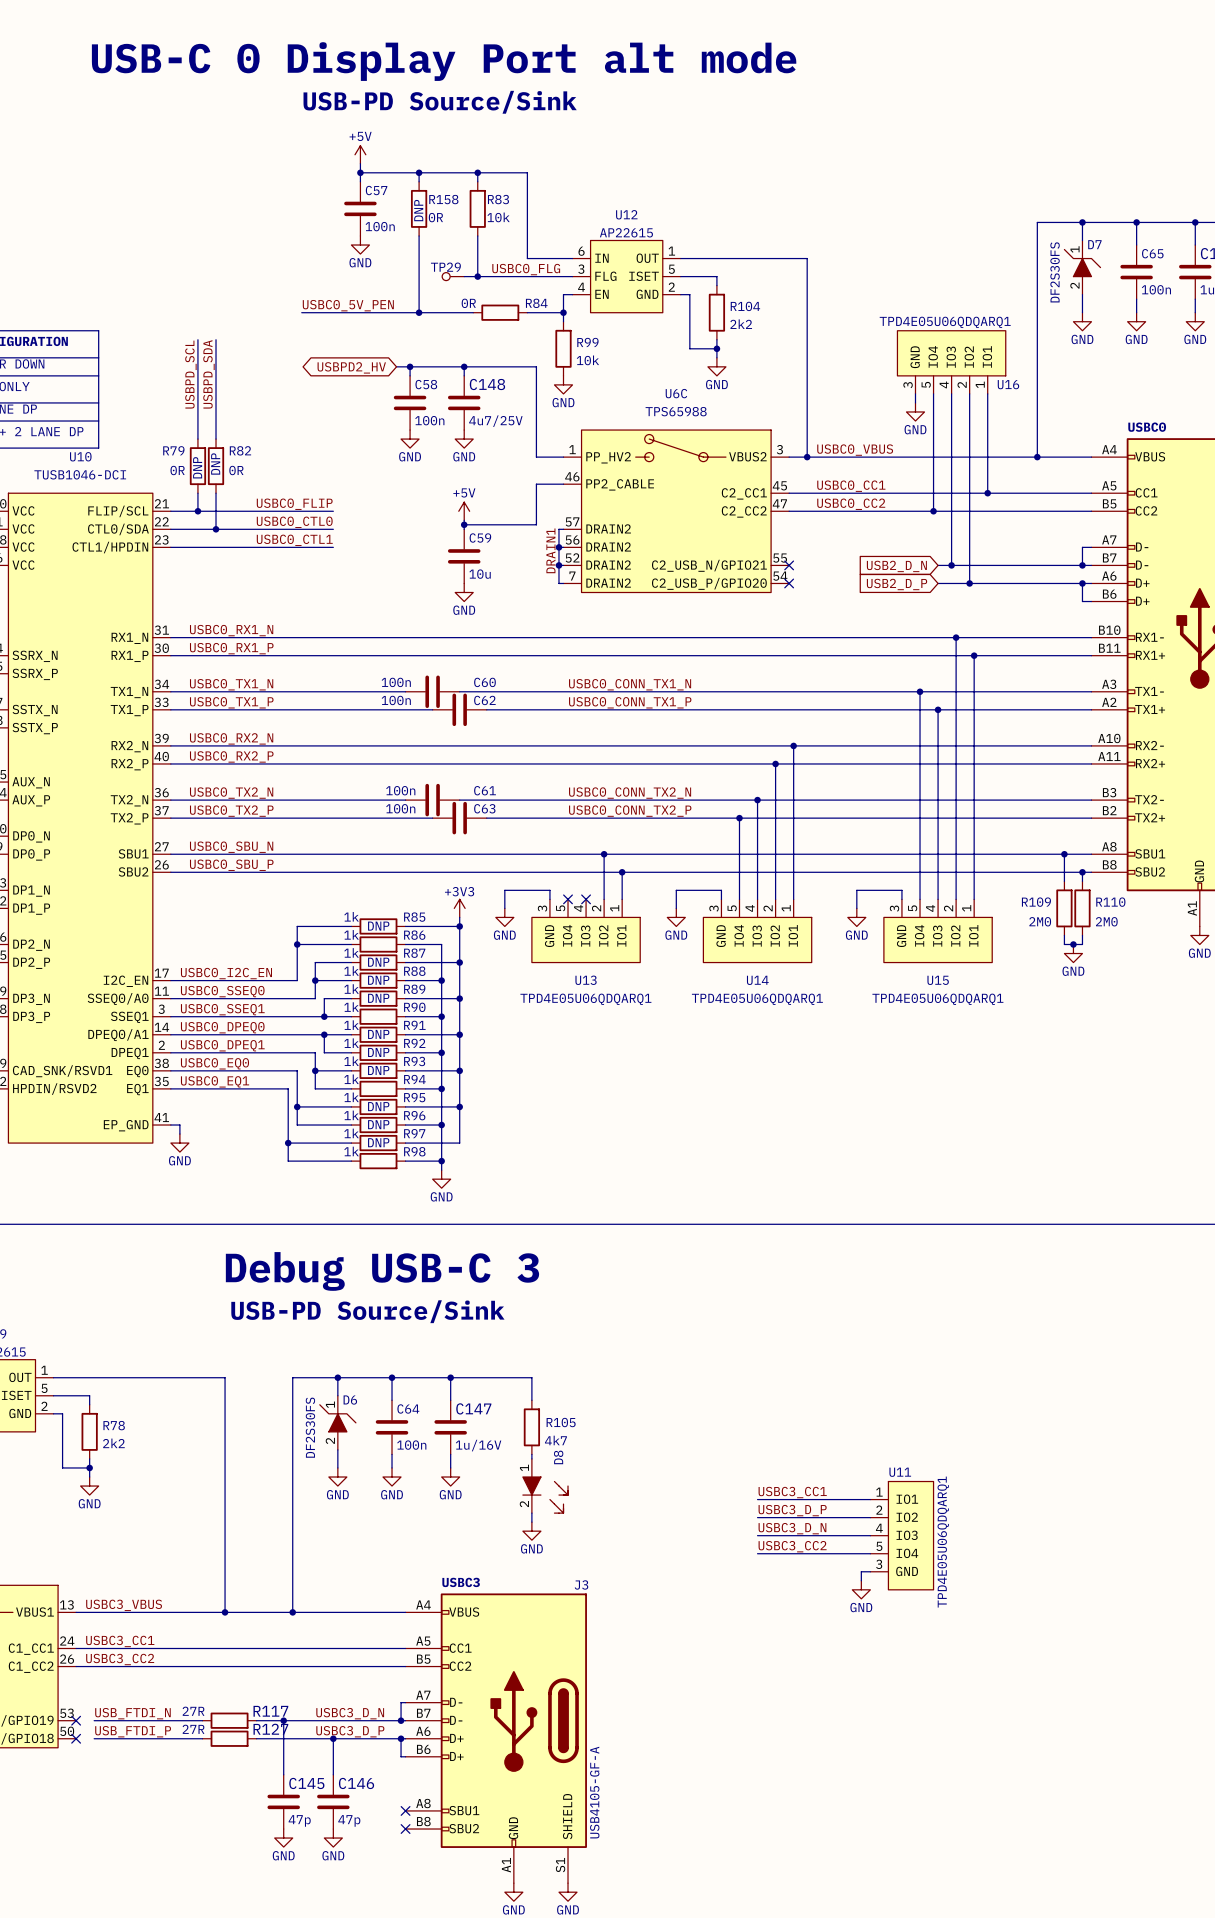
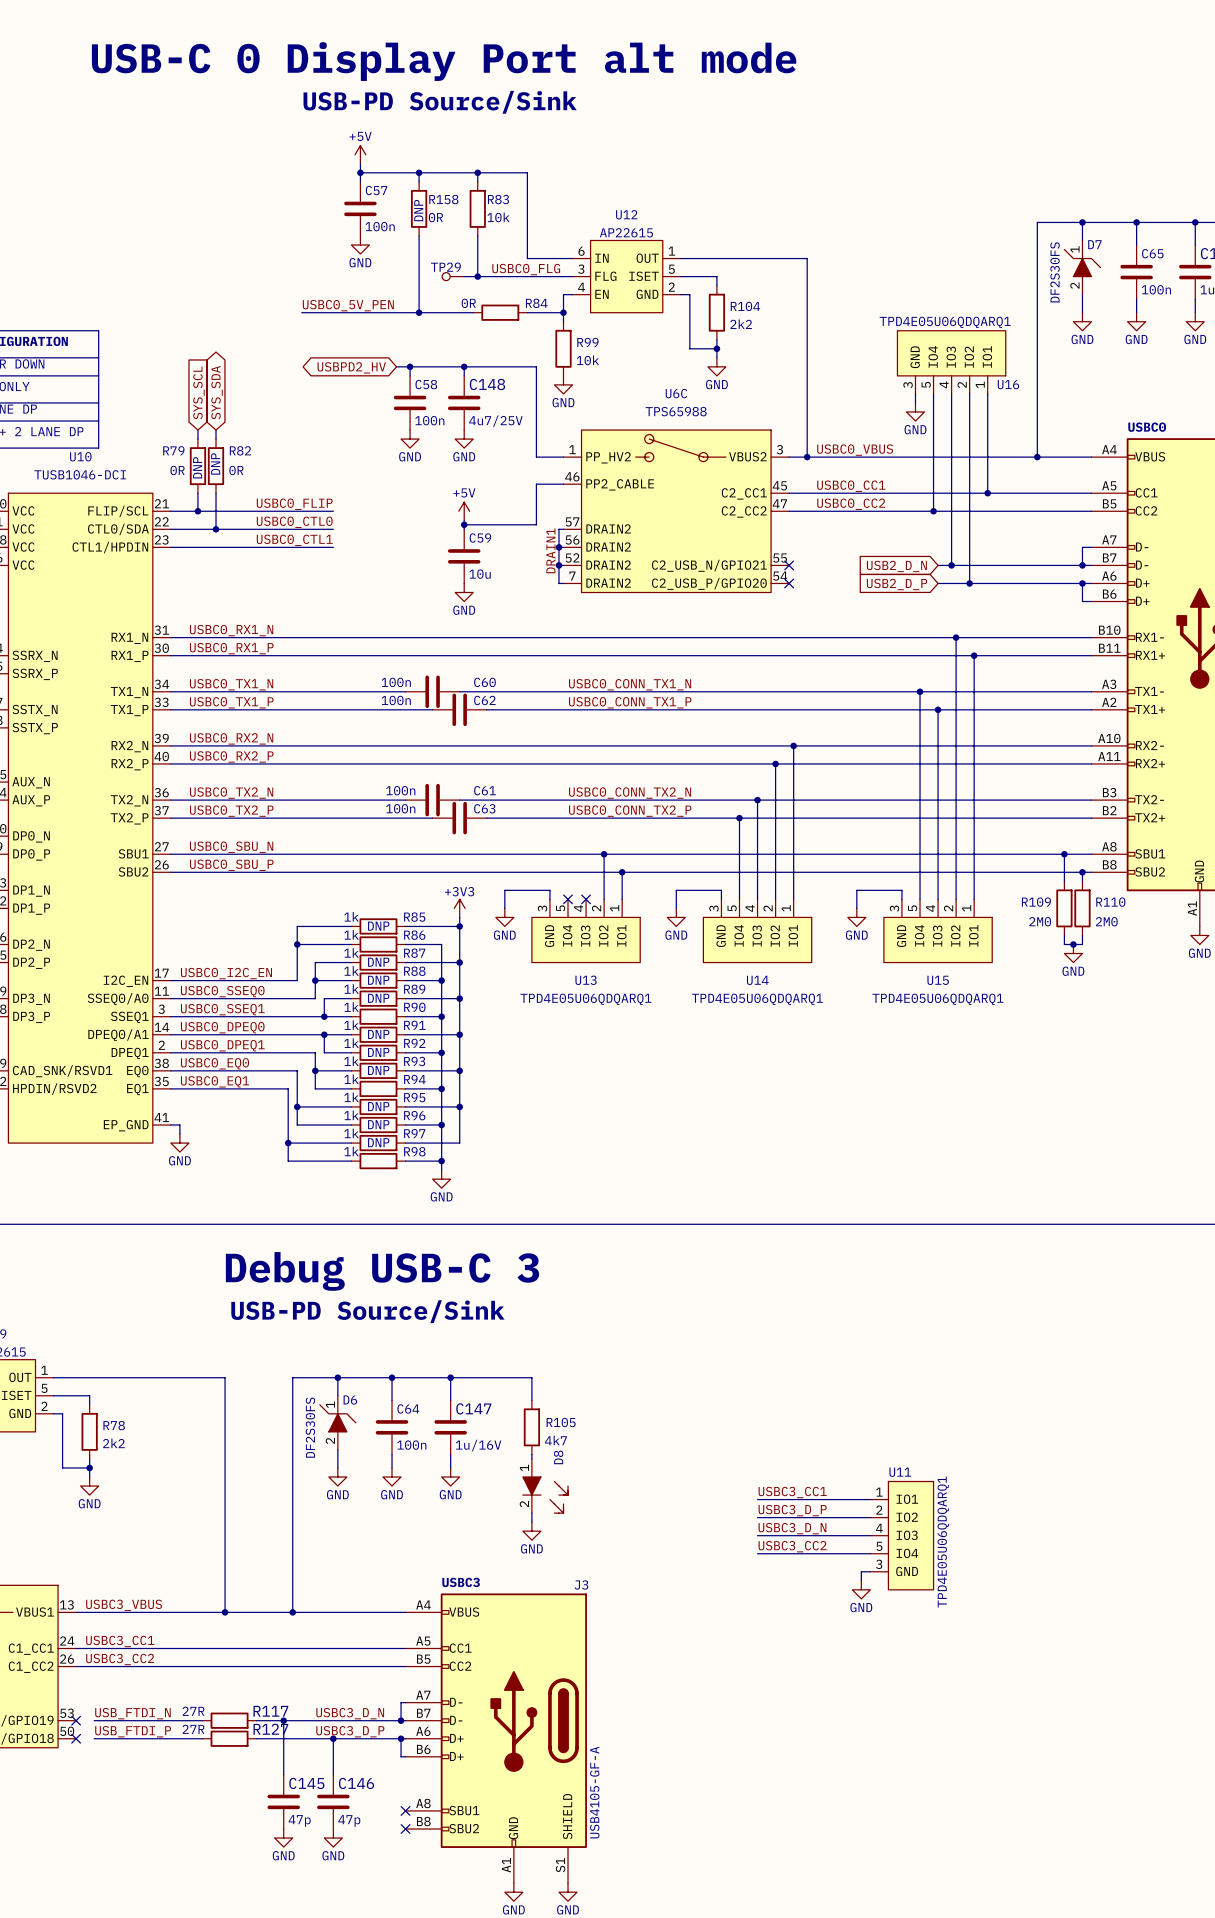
wire: (197, 339) (197, 430) -> none
wire: (216, 339) (216, 430) -> none
label: USBPD_SCL (190, 374) -> none
label: USBPD_SDA (208, 374) -> none
global label: none -> SYS_SCL (198, 392)
global label: none -> SYS_SDA (217, 392)

